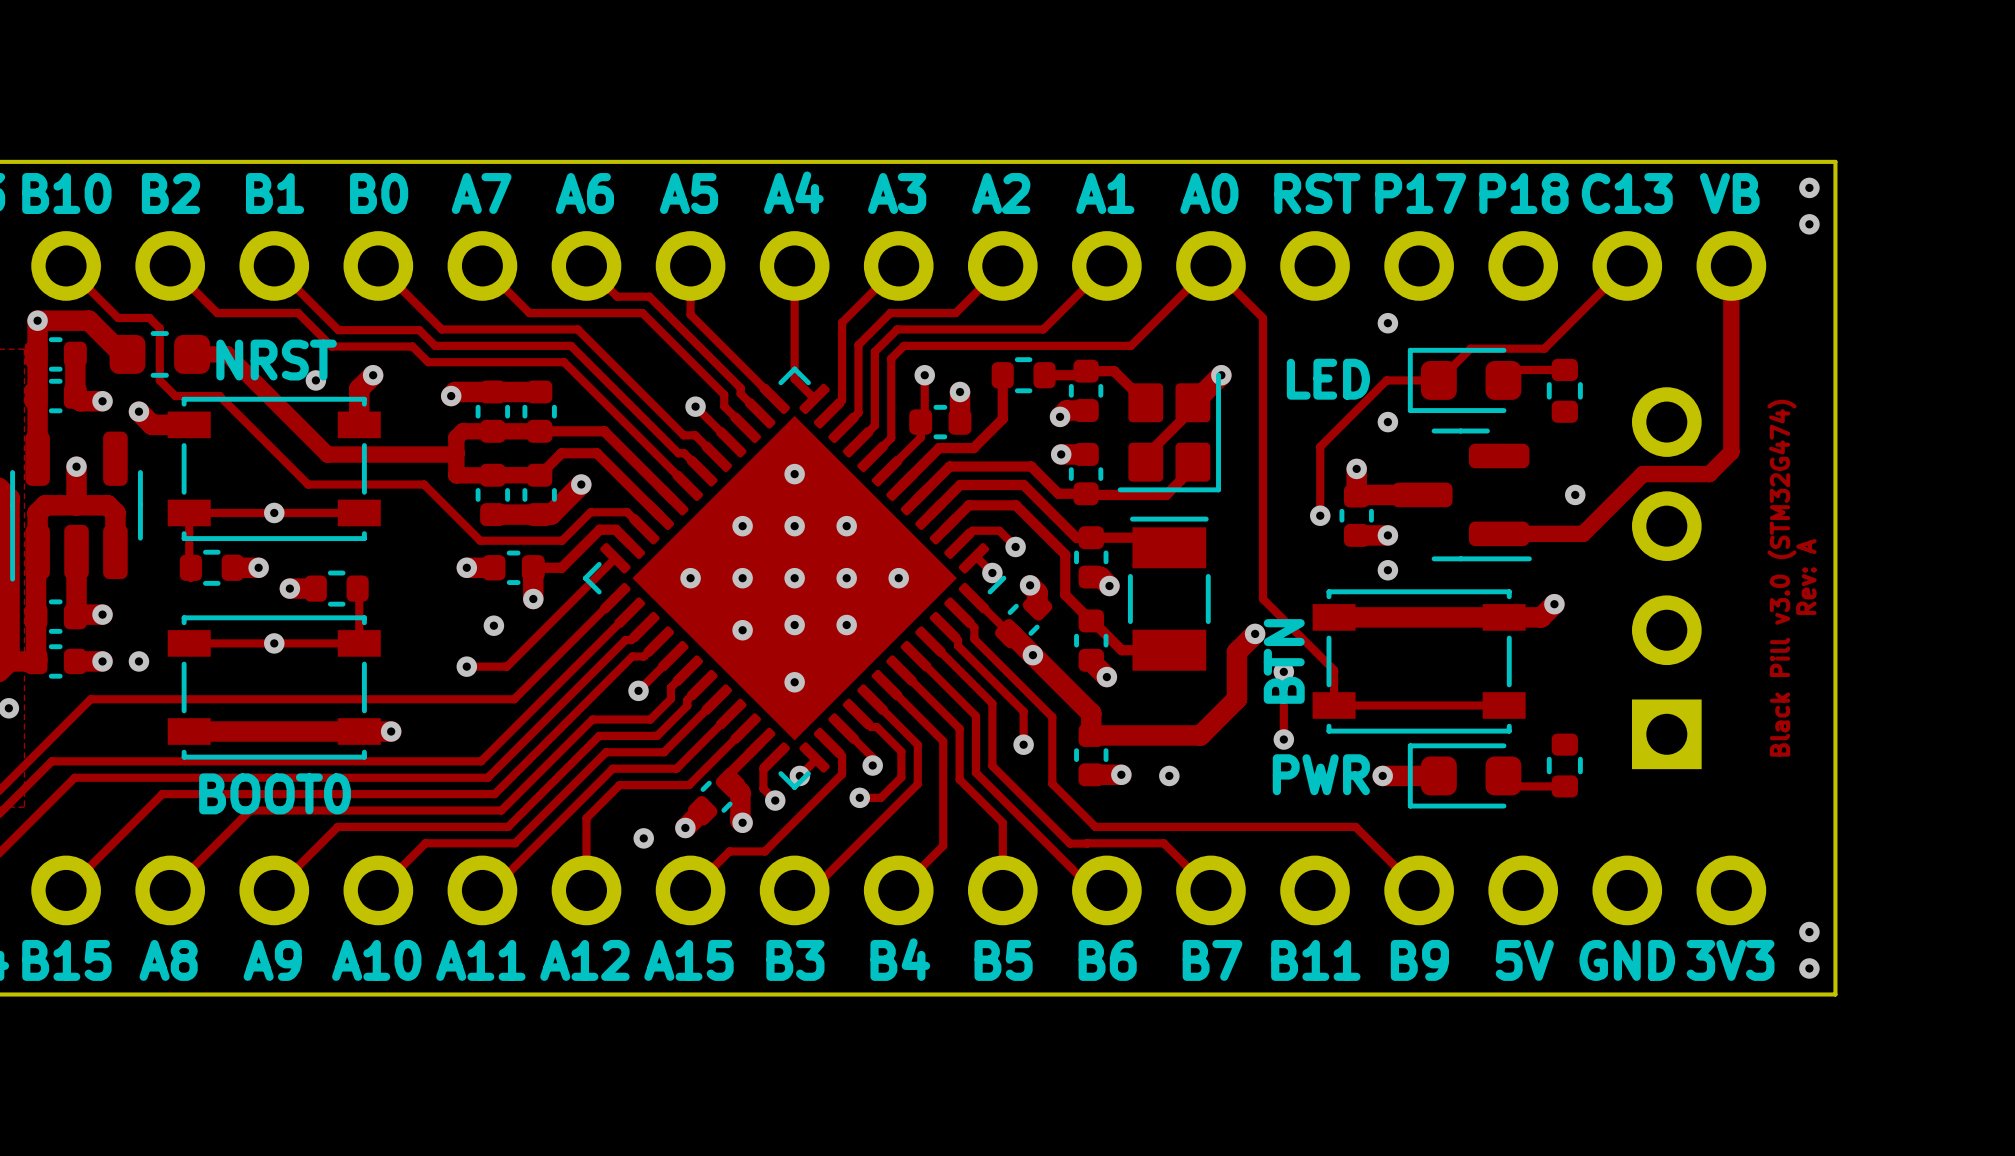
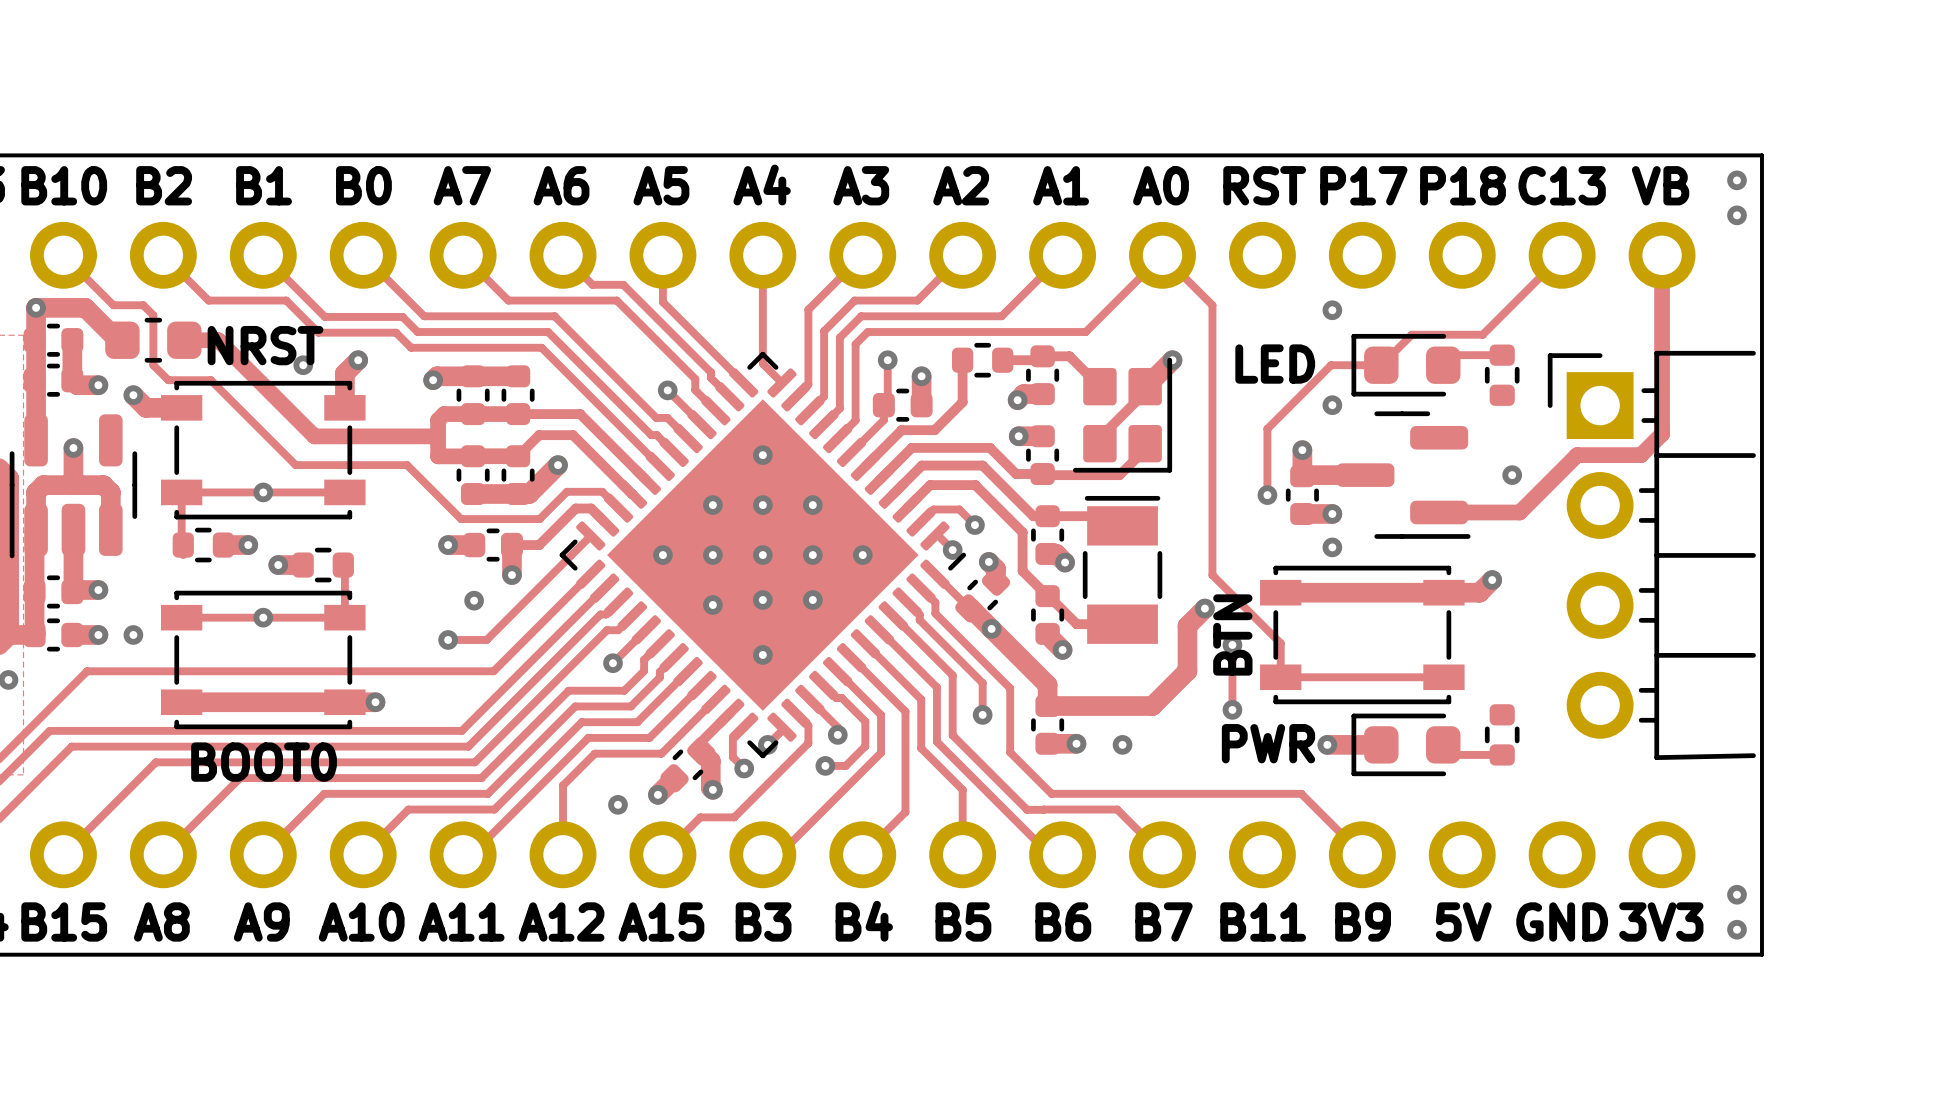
text: Rev: A (1806, 577) -> none
part side: bottom (1666, 578) -> top (1651, 555)
text: Black Pill v3.0 (STM32G474) (1781, 578) -> none

